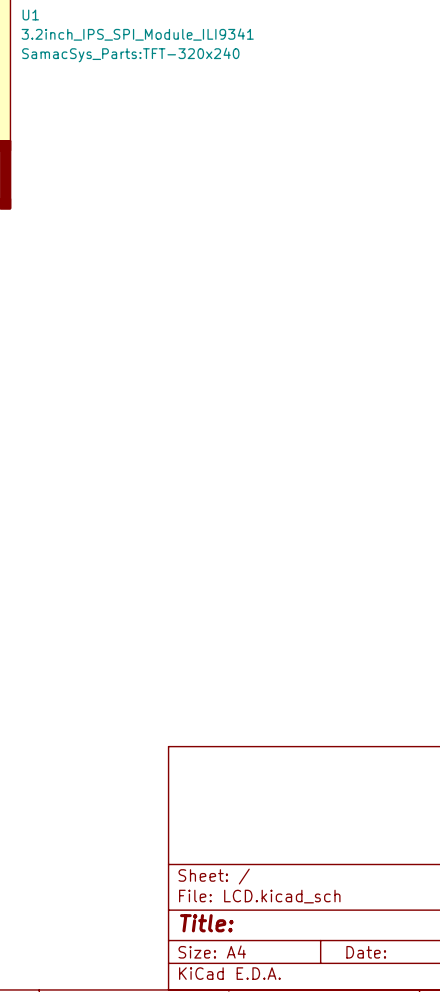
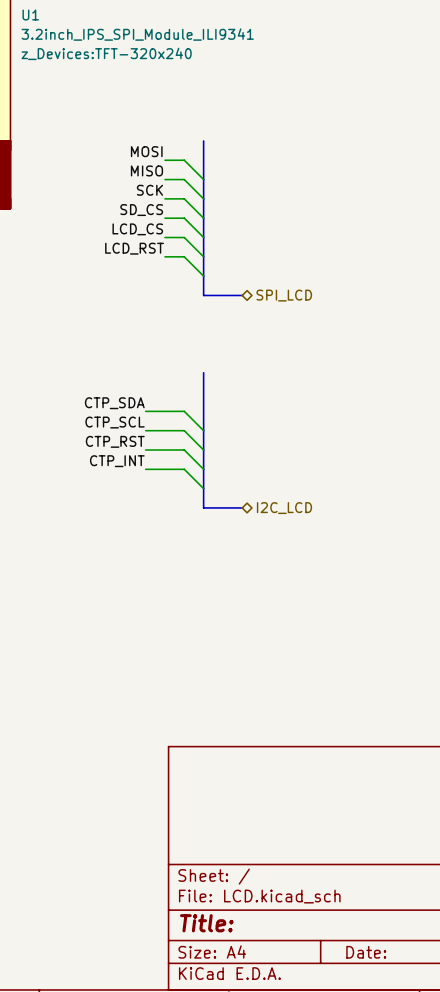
U1 text: SamacSys_Parts:TFT-320x240 (130, 55) -> z_Devices:TFT-320x240 (106, 53)
bus: none -> (203, 140) (203, 295) (242, 295)
label: none -> MOSI (146, 151)
wire: none -> (164, 160) (184, 160) (203, 179)
label: none -> MISO (146, 170)
wire: none -> (164, 179) (184, 179) (203, 198)
label: none -> SCK (149, 190)
wire: none -> (164, 198) (184, 198) (203, 218)
label: none -> SD_CS (141, 210)
wire: none -> (164, 218) (184, 218) (203, 237)
label: none -> LCD_CS (137, 229)
wire: none -> (164, 237) (184, 237) (203, 256)
label: none -> LCD_RST (134, 248)
wire: none -> (164, 256) (184, 256) (203, 276)
hierarchical label: none -> SPI_LCD (284, 295)
bus: none -> (203, 372) (203, 507) (242, 507)
label: none -> CTP_SDA (114, 403)
wire: none -> (145, 411) (184, 411) (203, 430)
label: none -> CTP_SCL (115, 422)
wire: none -> (145, 430) (184, 430) (203, 450)
label: none -> CTP_RST (115, 441)
wire: none -> (145, 450) (184, 450) (203, 469)
label: none -> CTP_INT (117, 461)
wire: none -> (145, 469) (184, 469) (203, 488)
hierarchical label: none -> I2C_LCD (284, 508)

